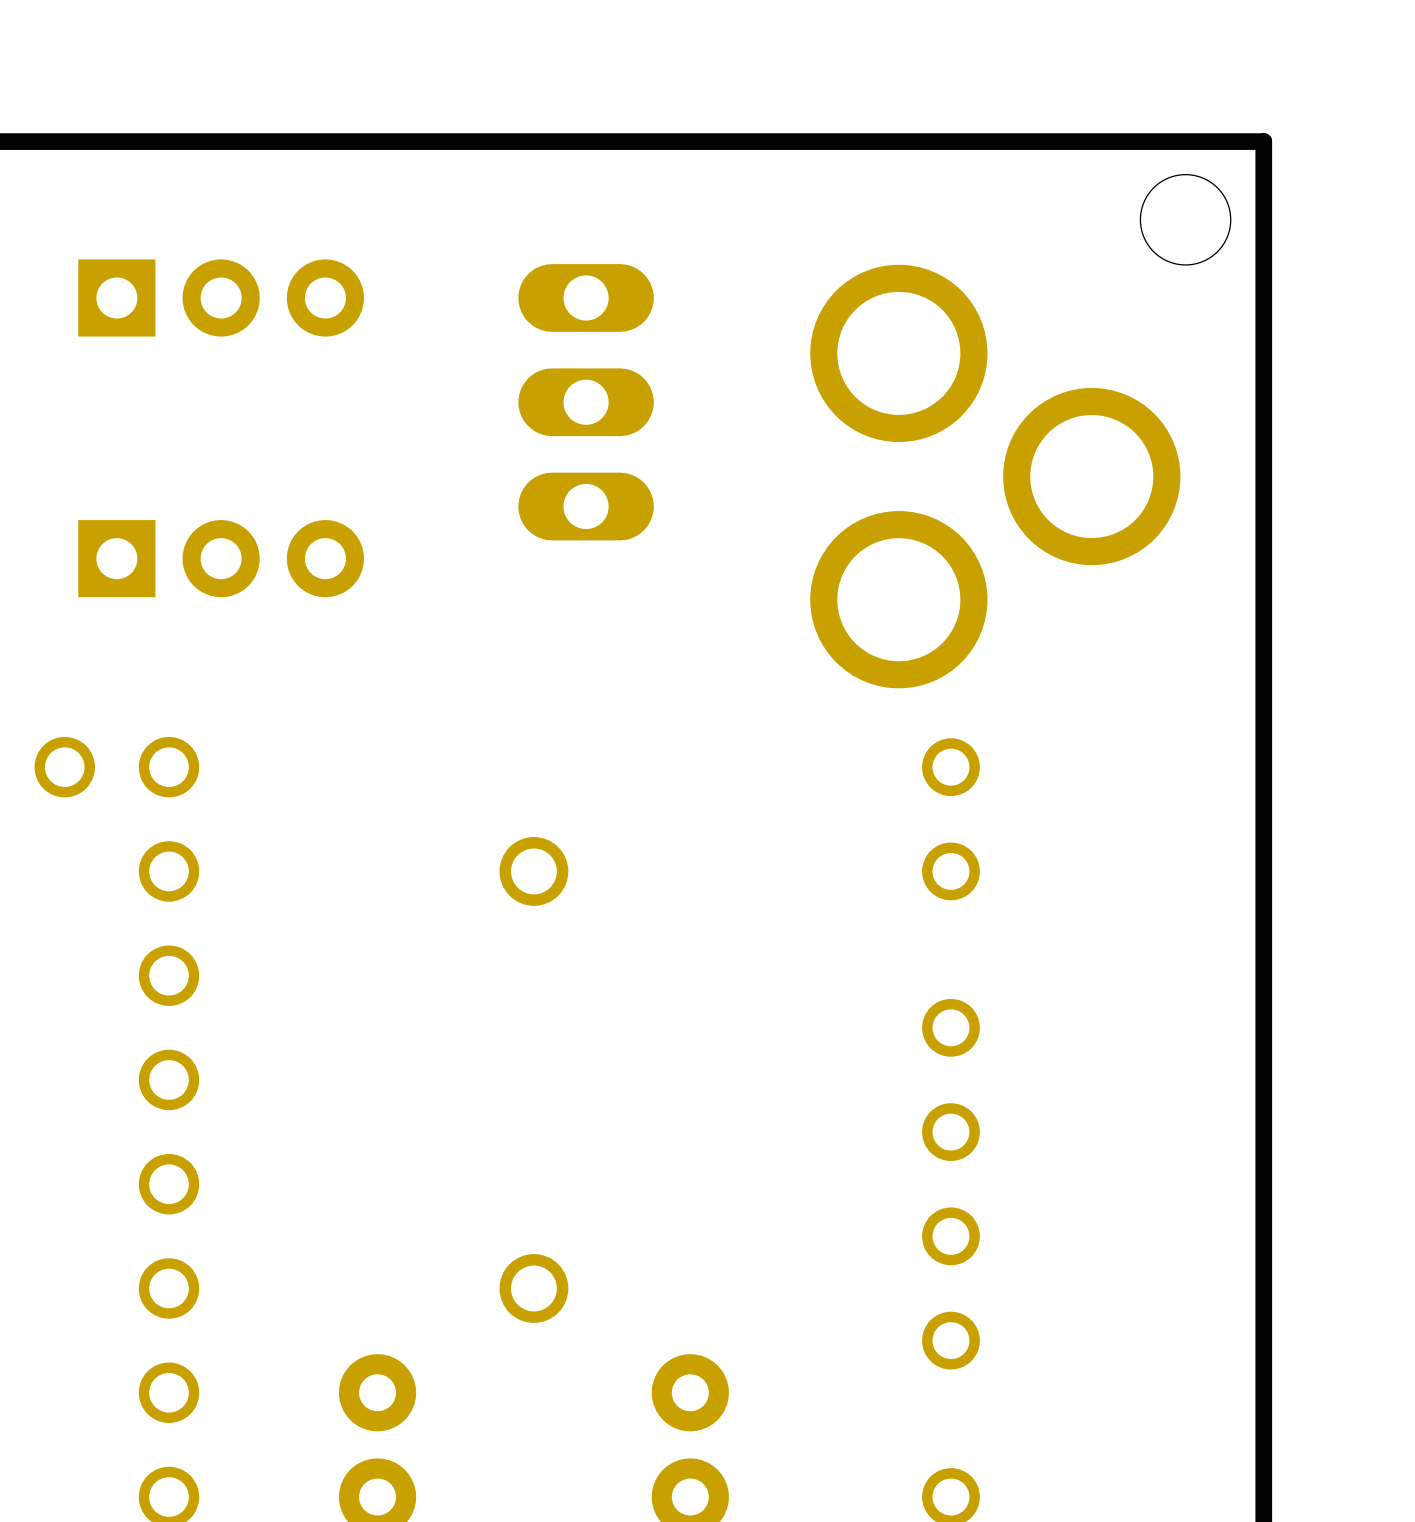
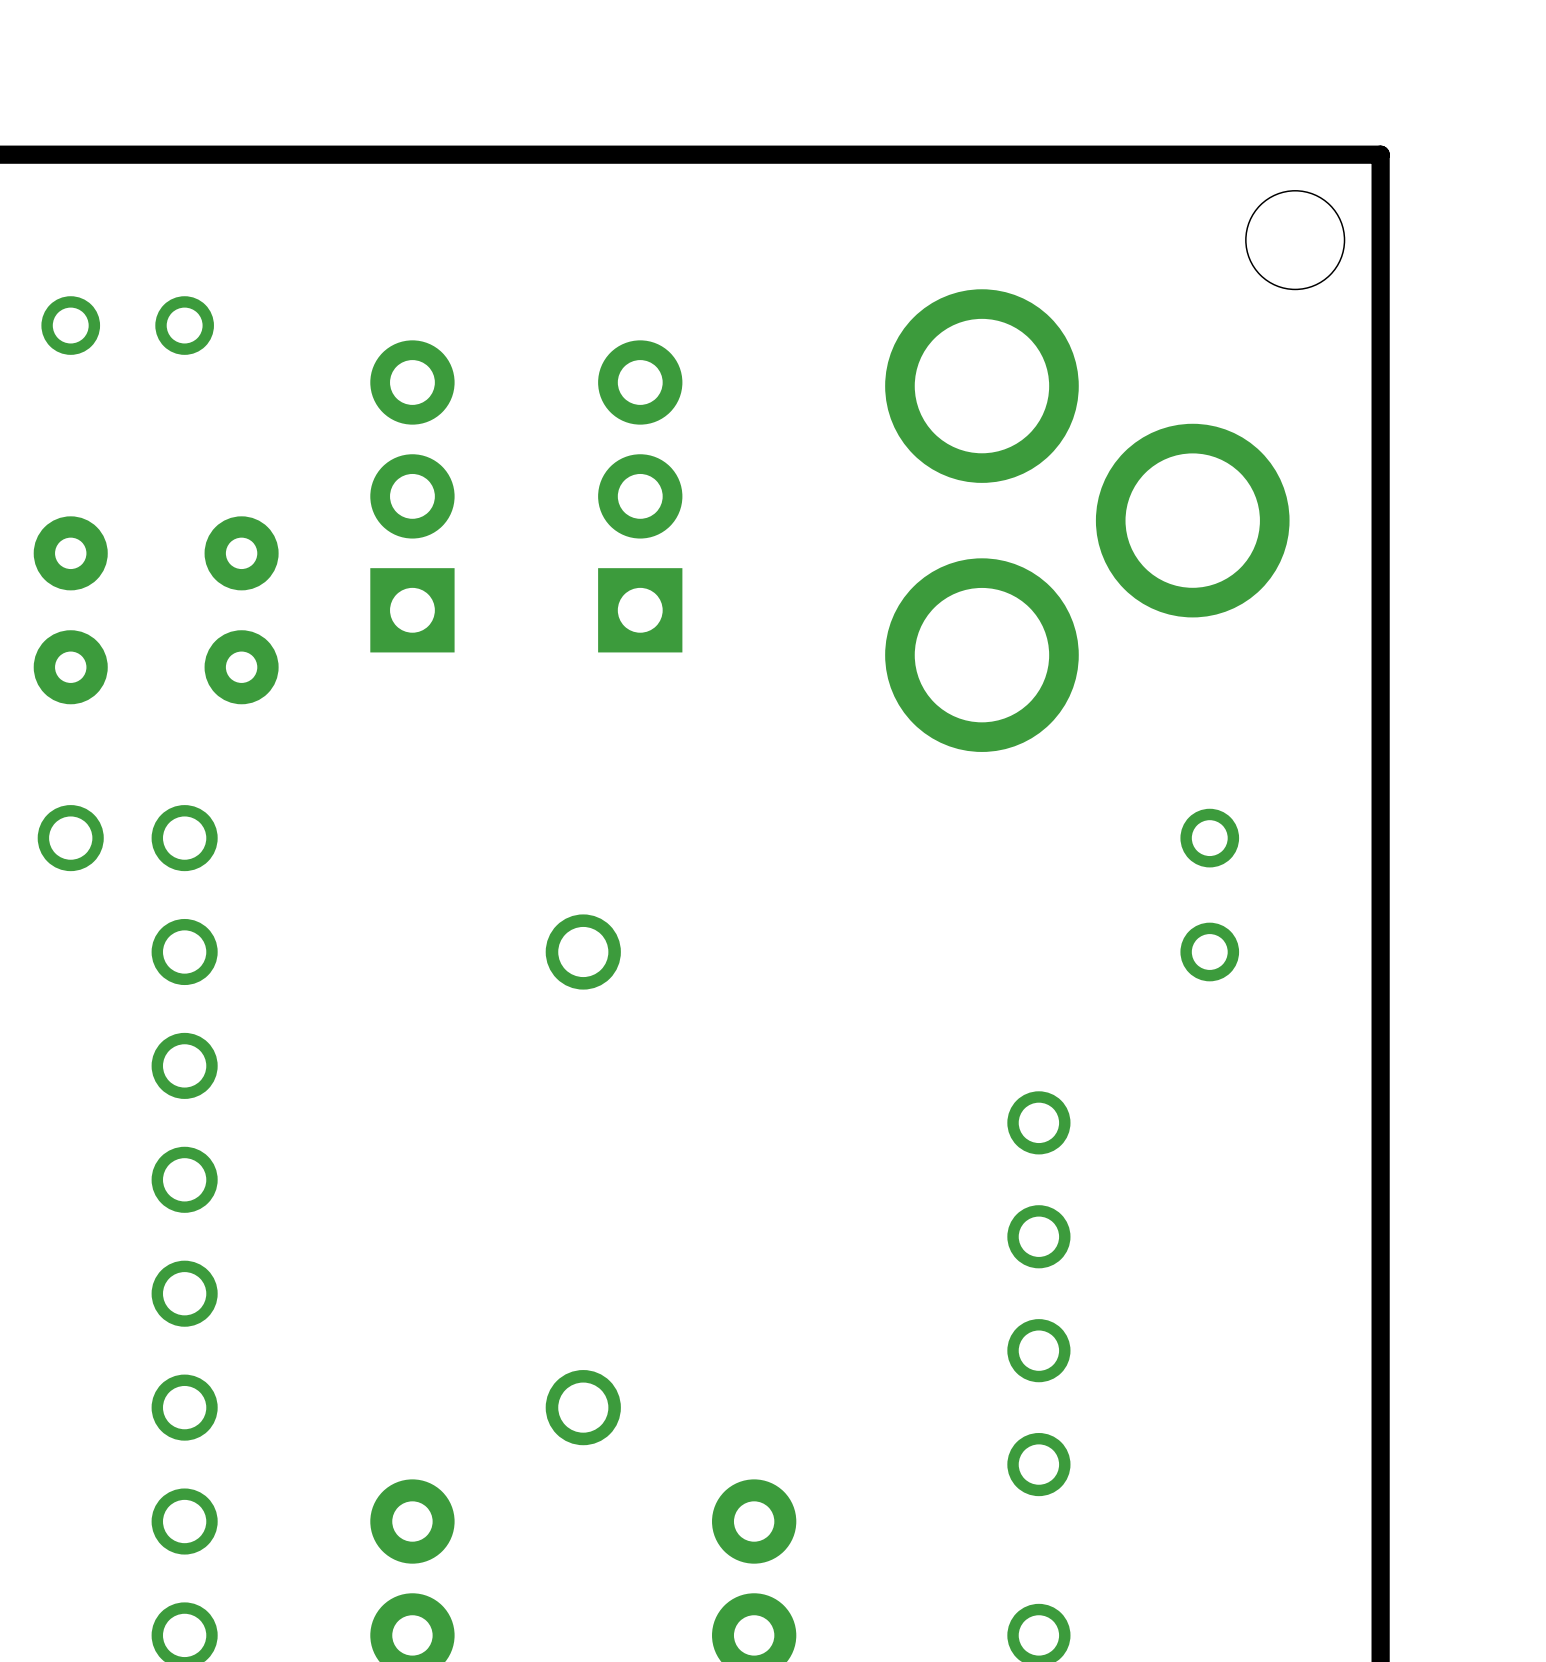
part: none -> (127, 325)
part: (221, 297) -> none
part: (586, 402) -> none
part: none -> (412, 496)
part: none -> (640, 496)
part footprint: [78, 520, 364, 598] -> [204, 516, 279, 705]
part: none -> (70, 610)
part: (950, 819) -> none
part: none -> (1209, 895)

